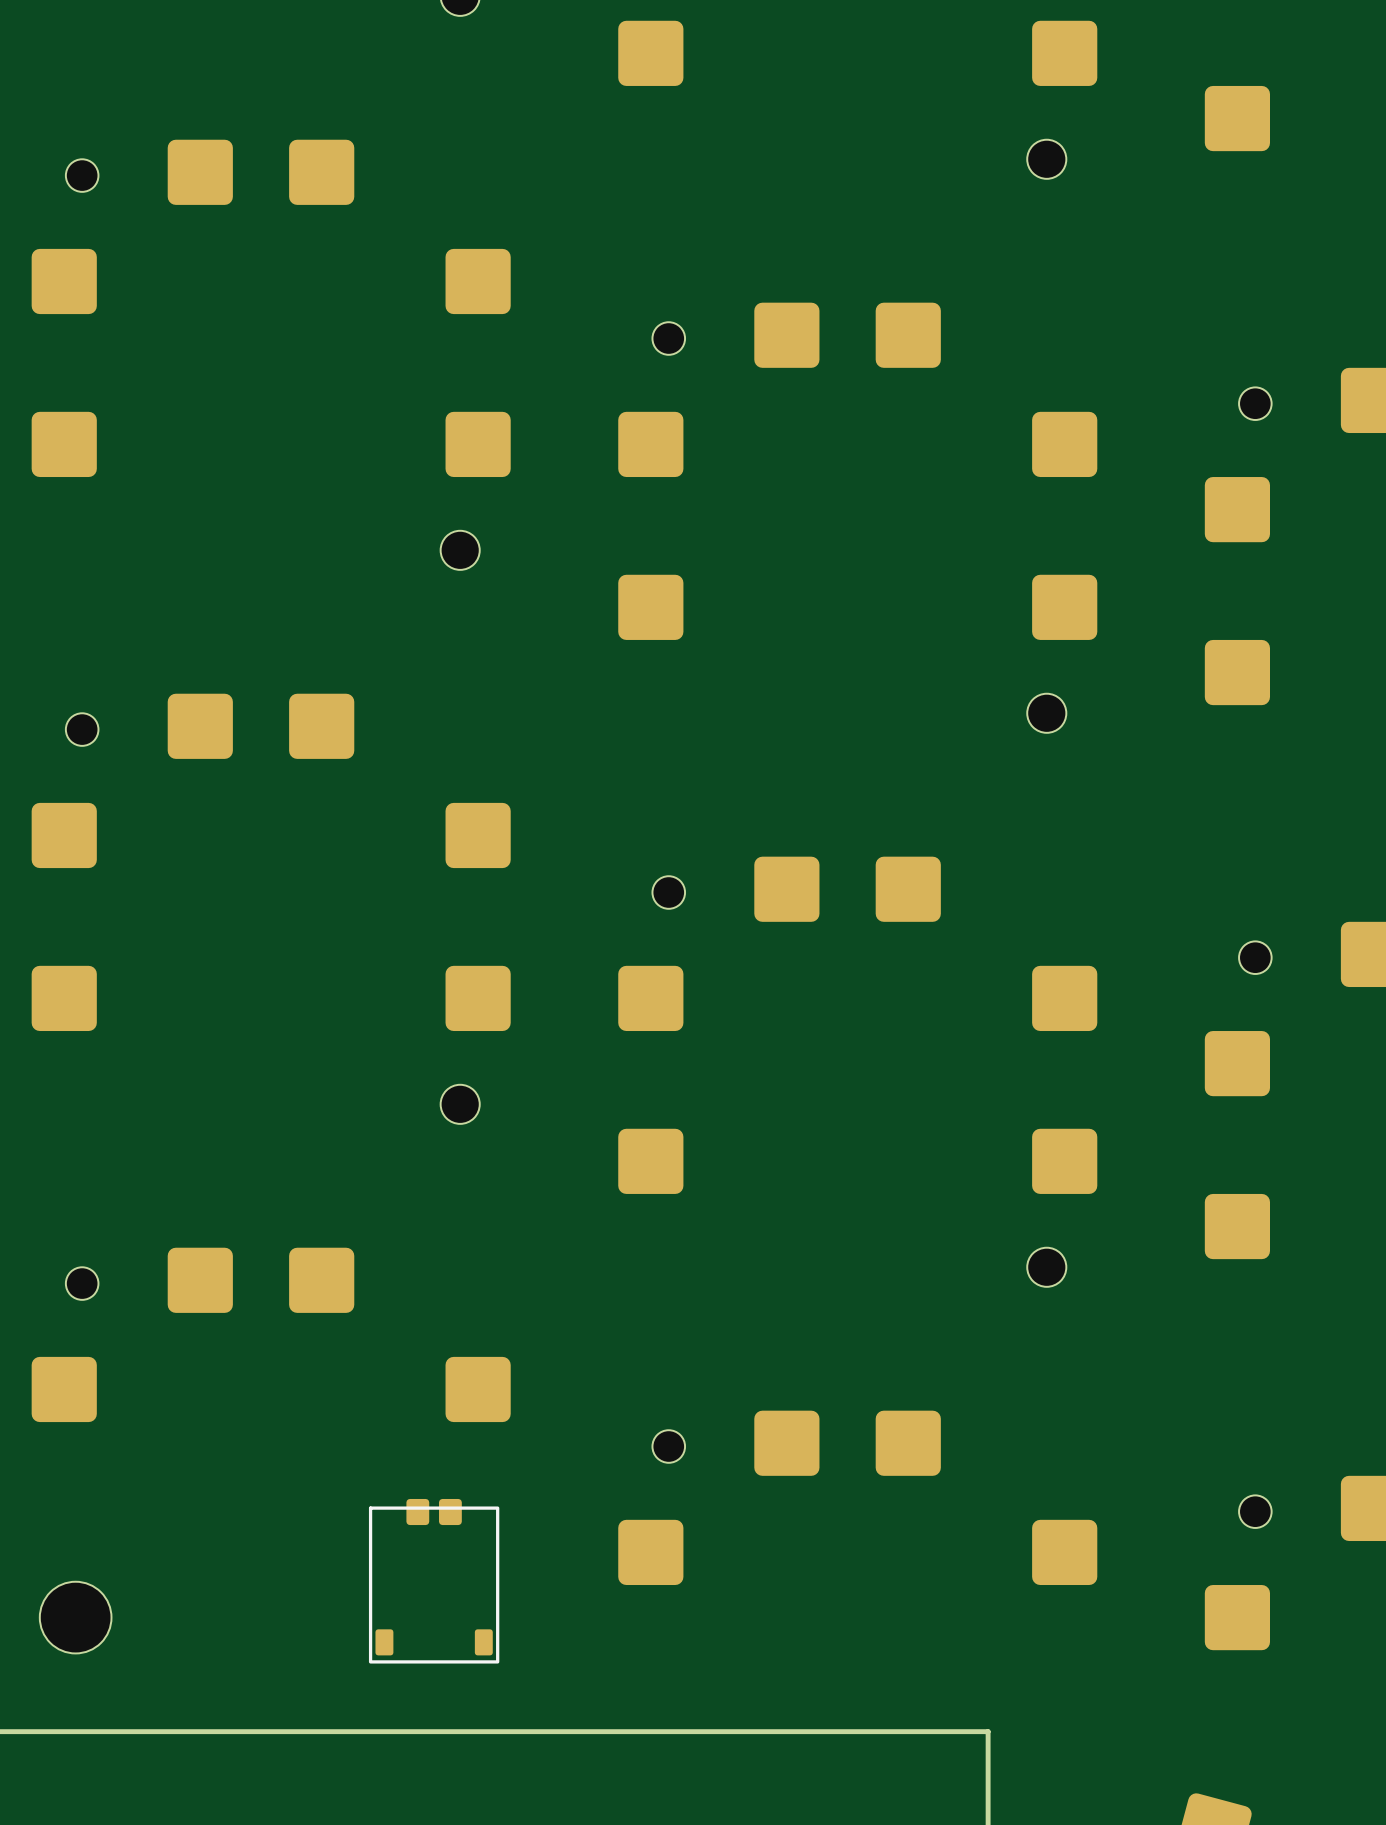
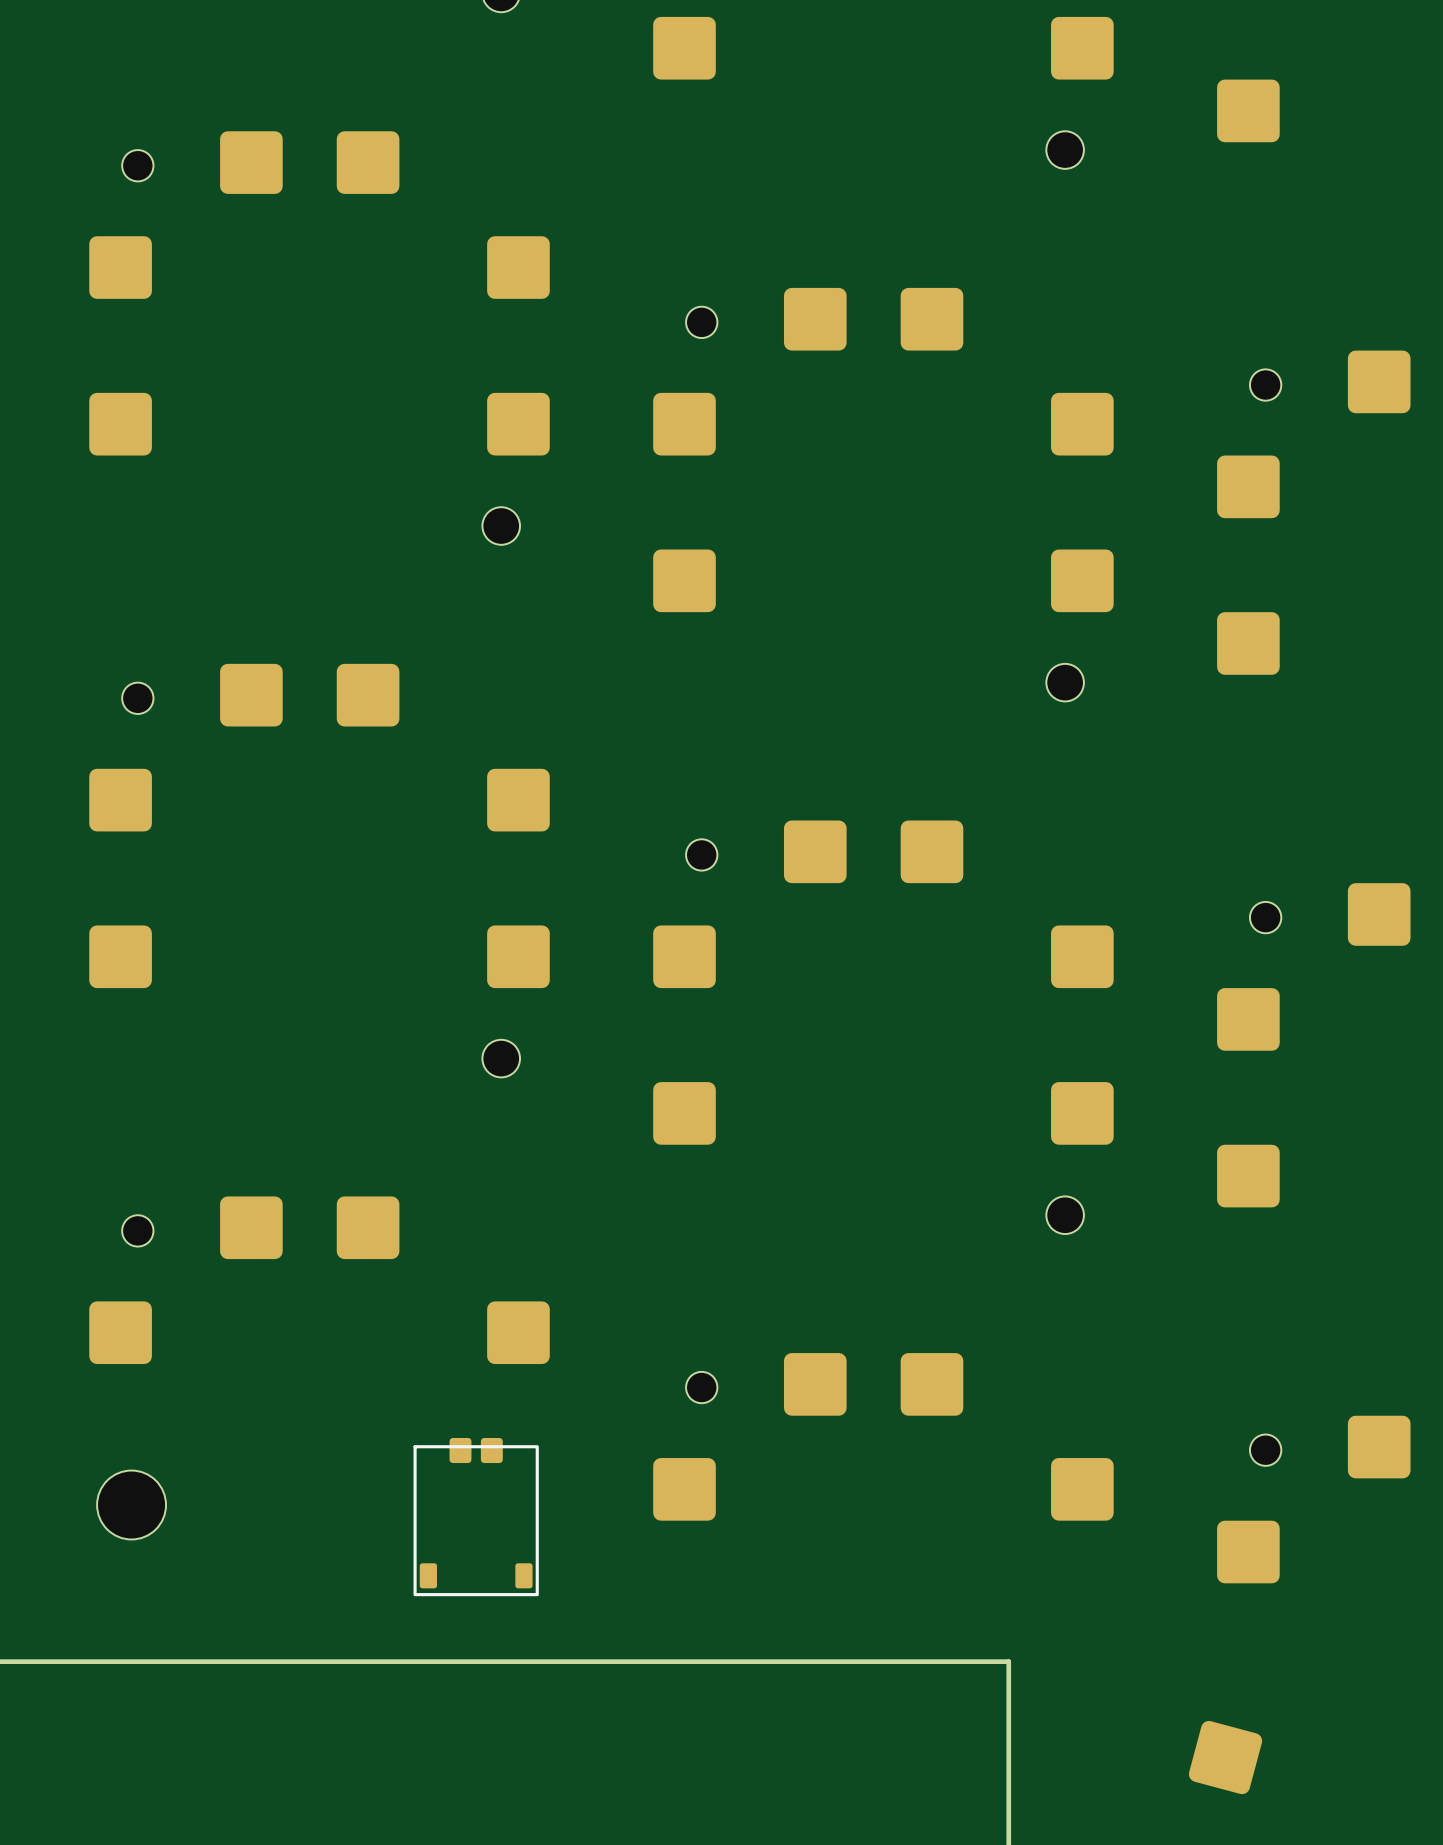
part position: (75, 1617) -> (131, 1505)

